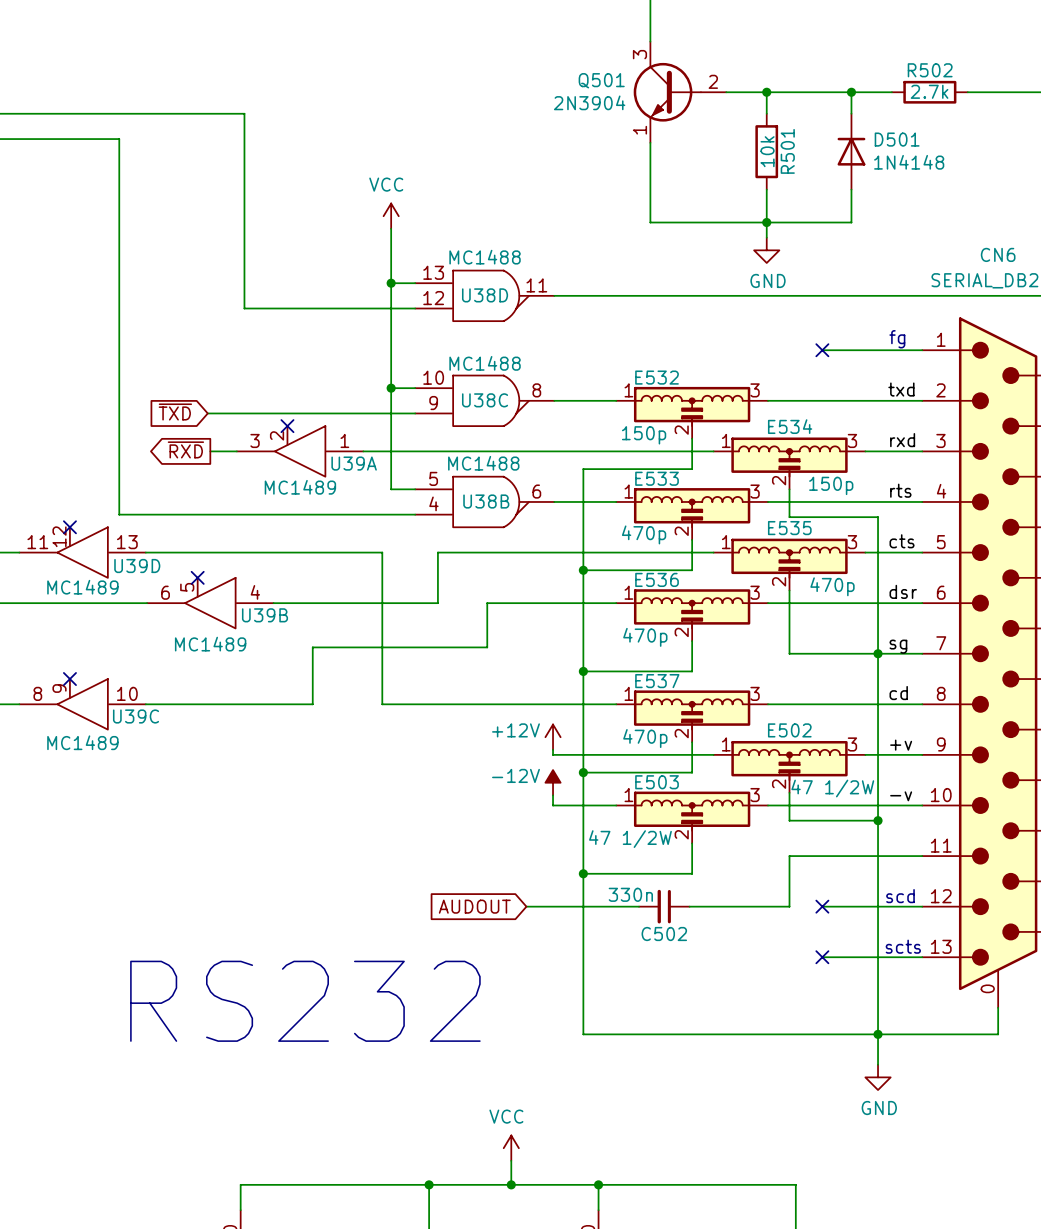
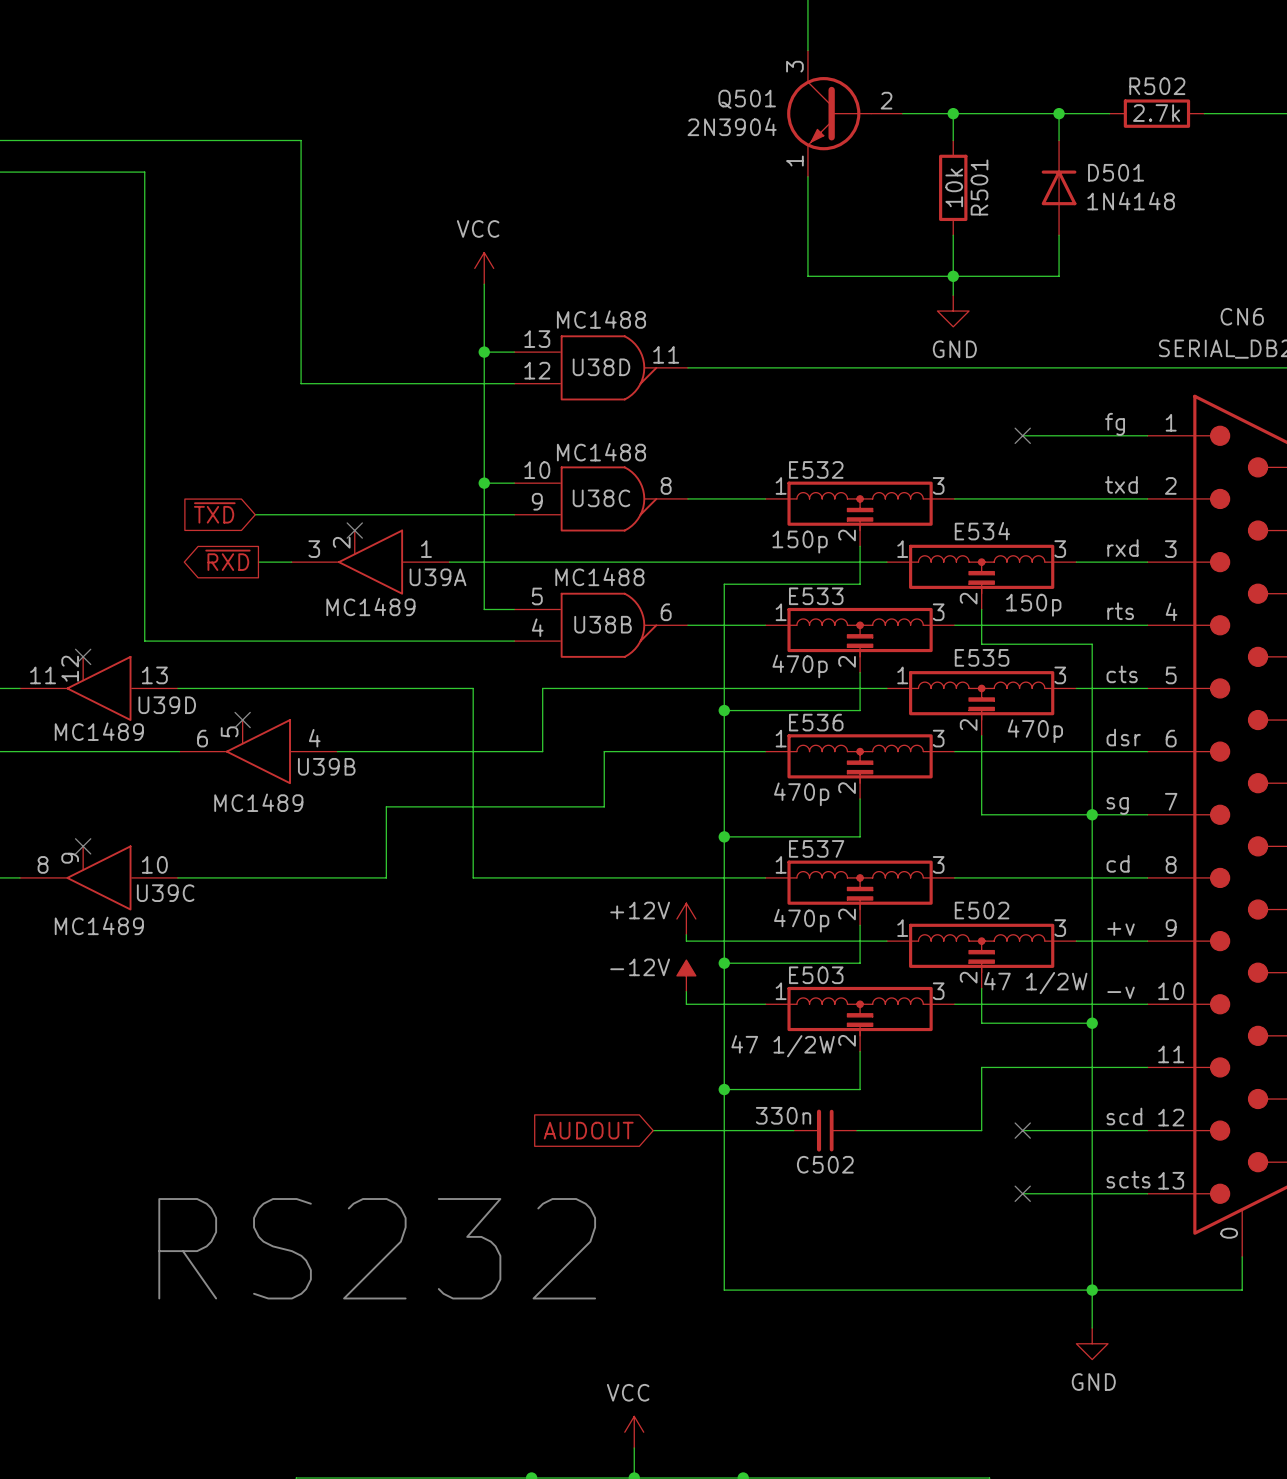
text: fg (897, 339) -> none
label: none -> fg (1115, 424)
label: none -> scd (1124, 1116)
text: scd (900, 896) -> none
label: none -> scts (1128, 1179)
text: scts (903, 946) -> none

